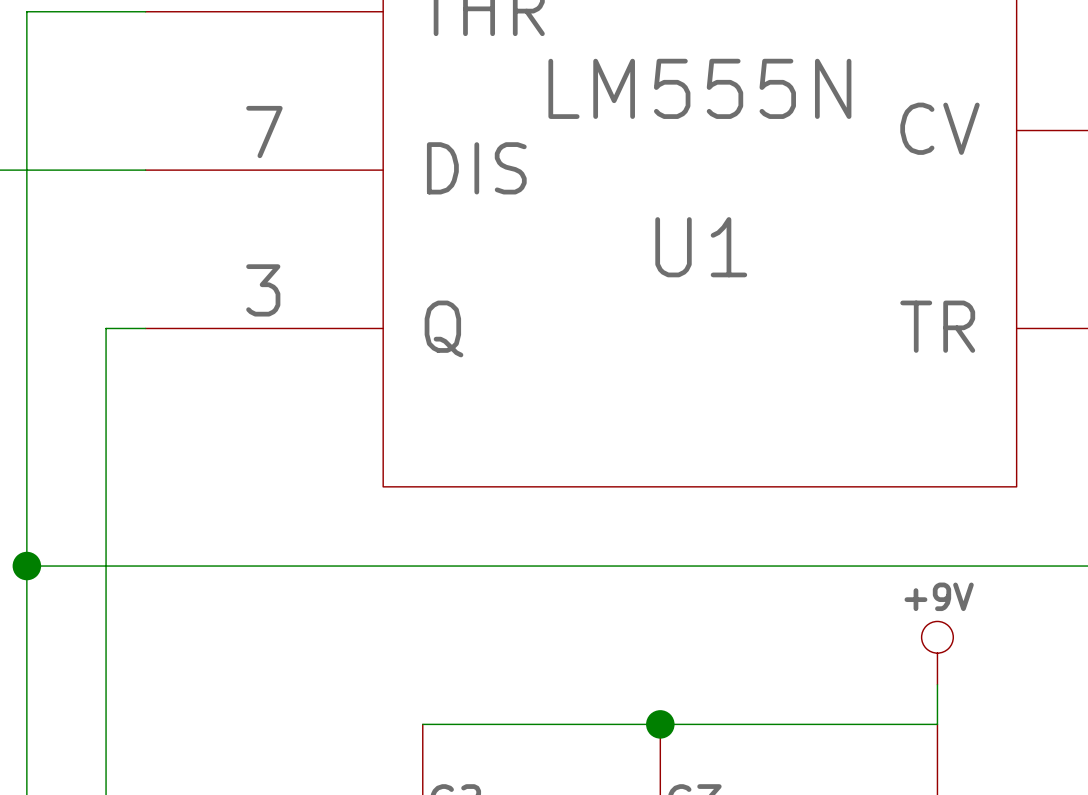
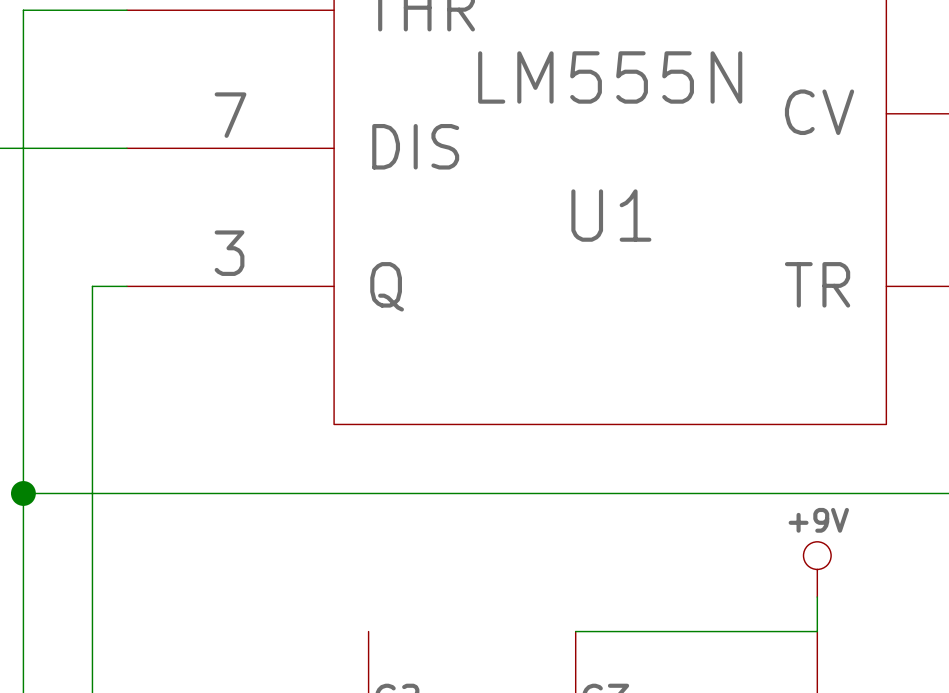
wire: (422, 724) (660, 724) -> none
junction: (660, 724) -> none

